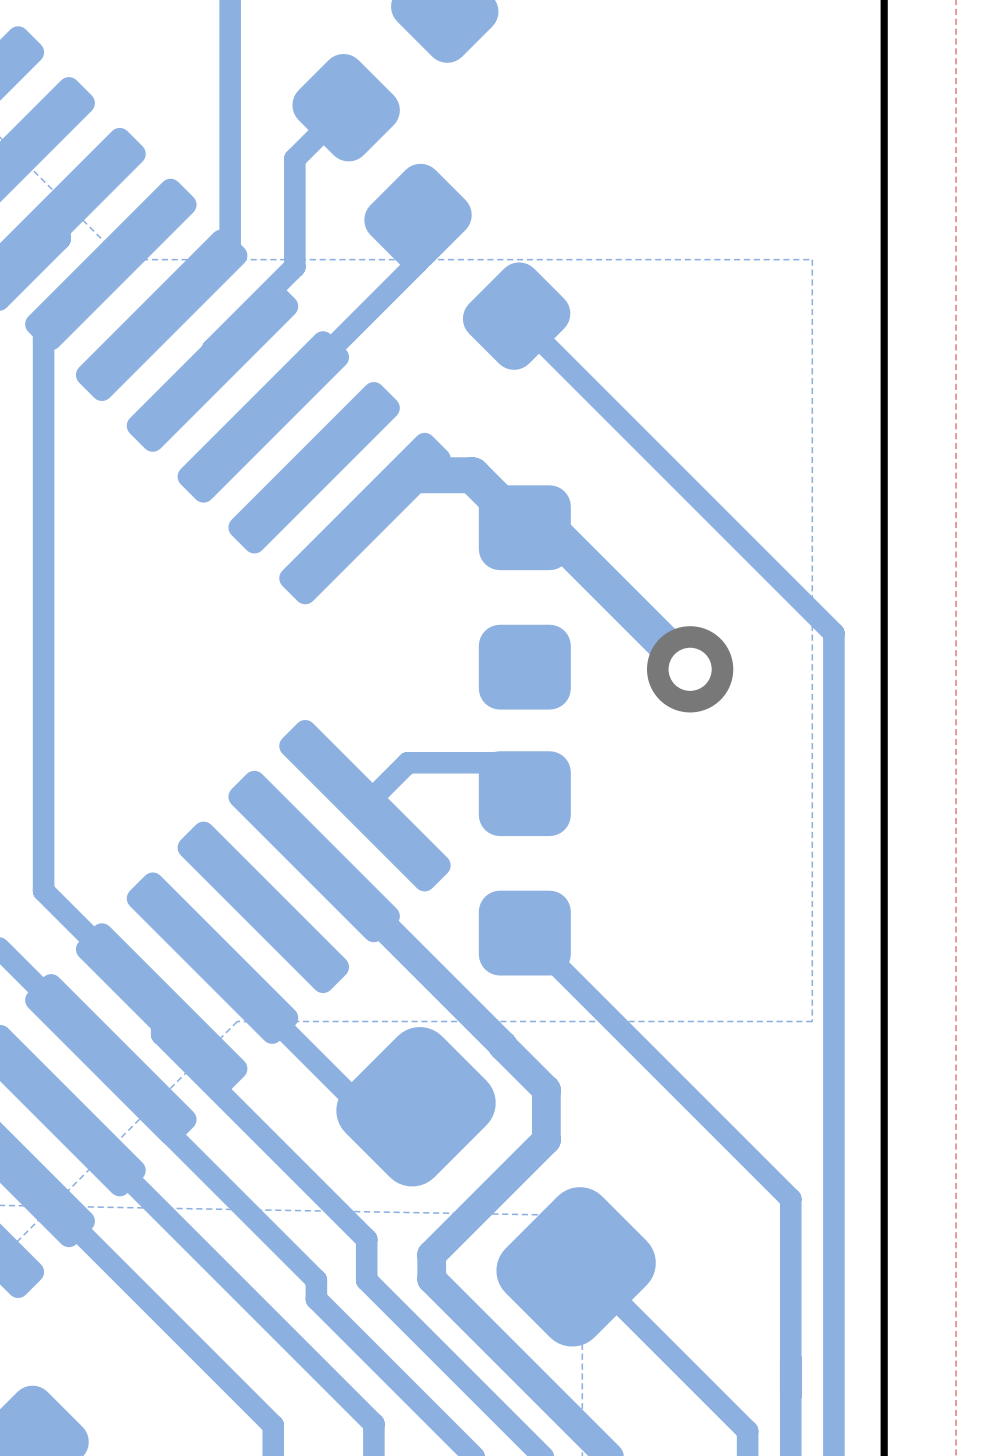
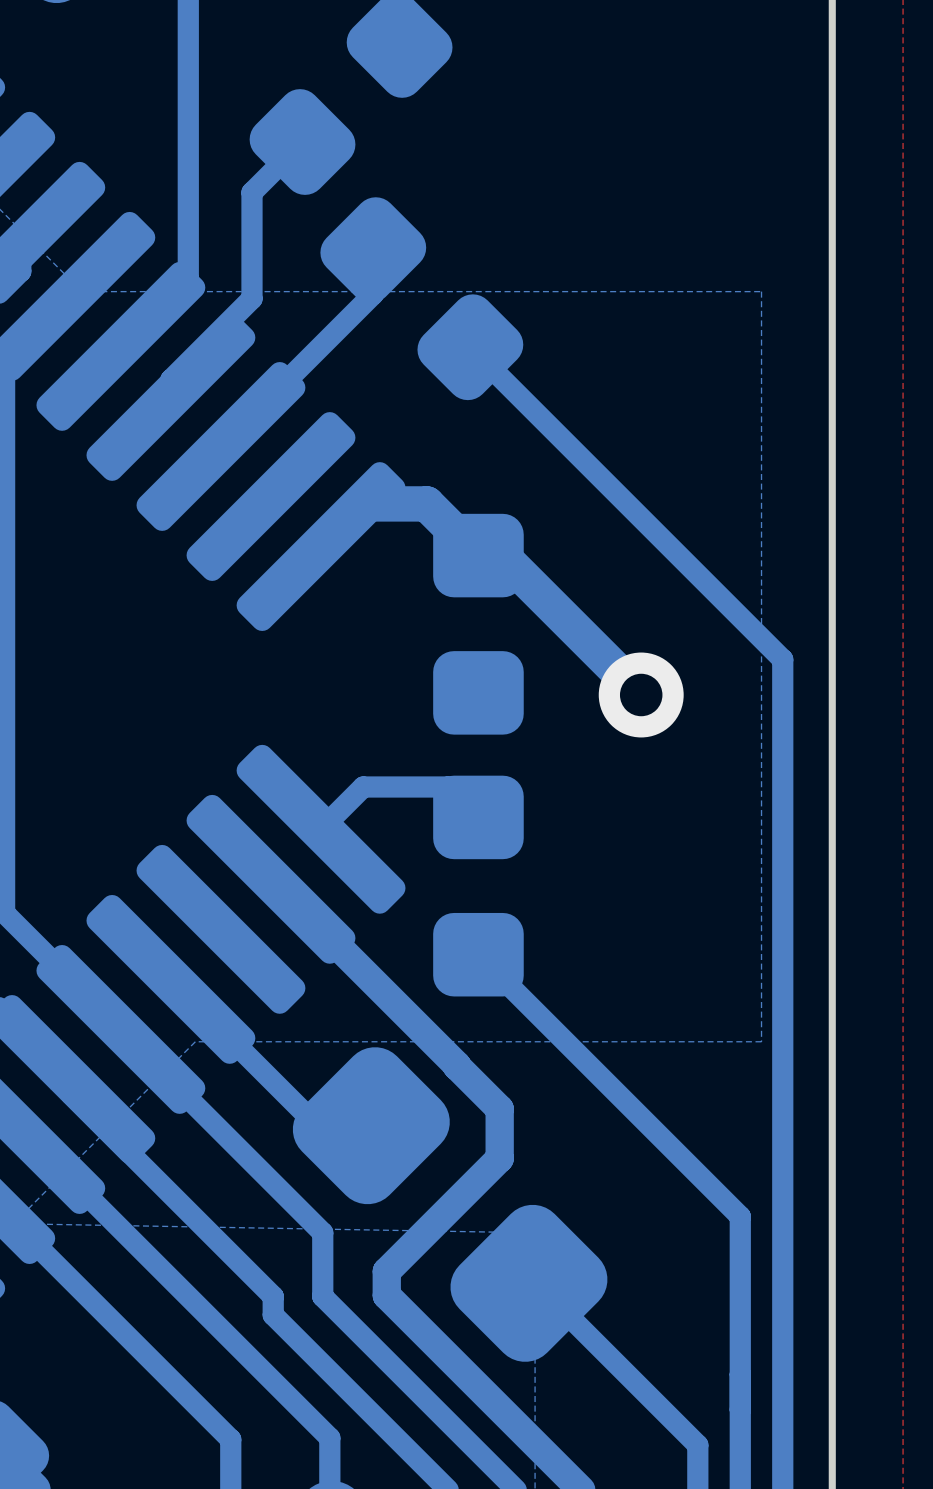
bottom track: (161, 1008) (161, 1034) (366, 1239) -> (120, 1030) (322, 1232) (322, 1256)

